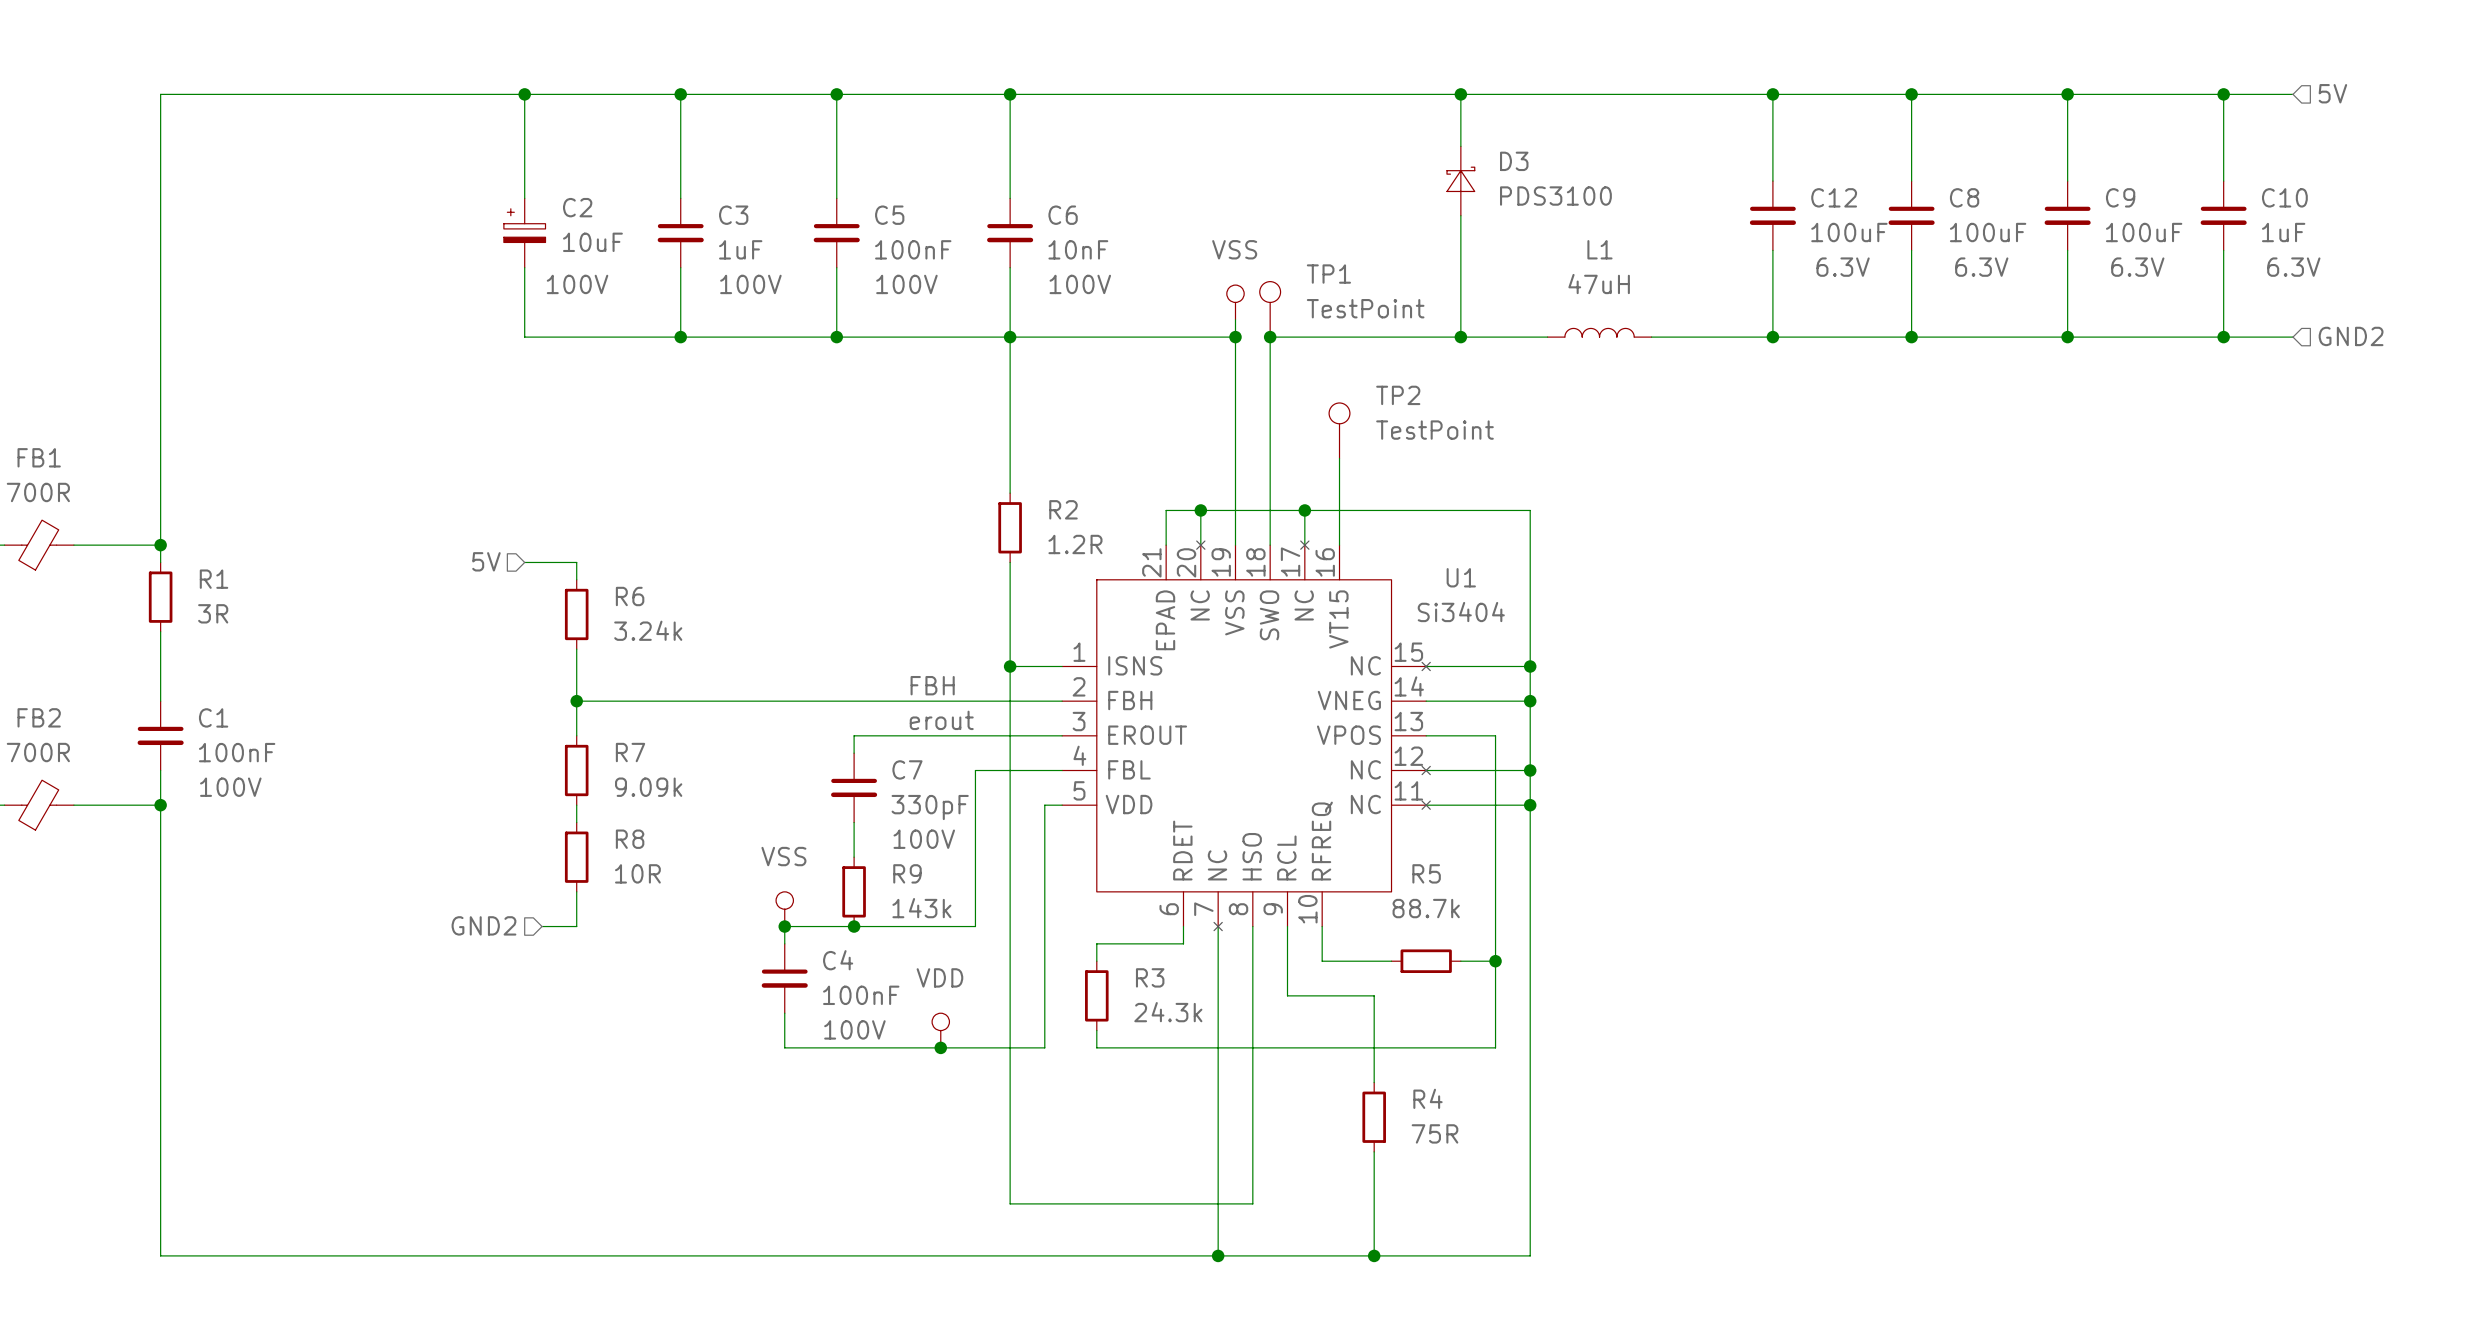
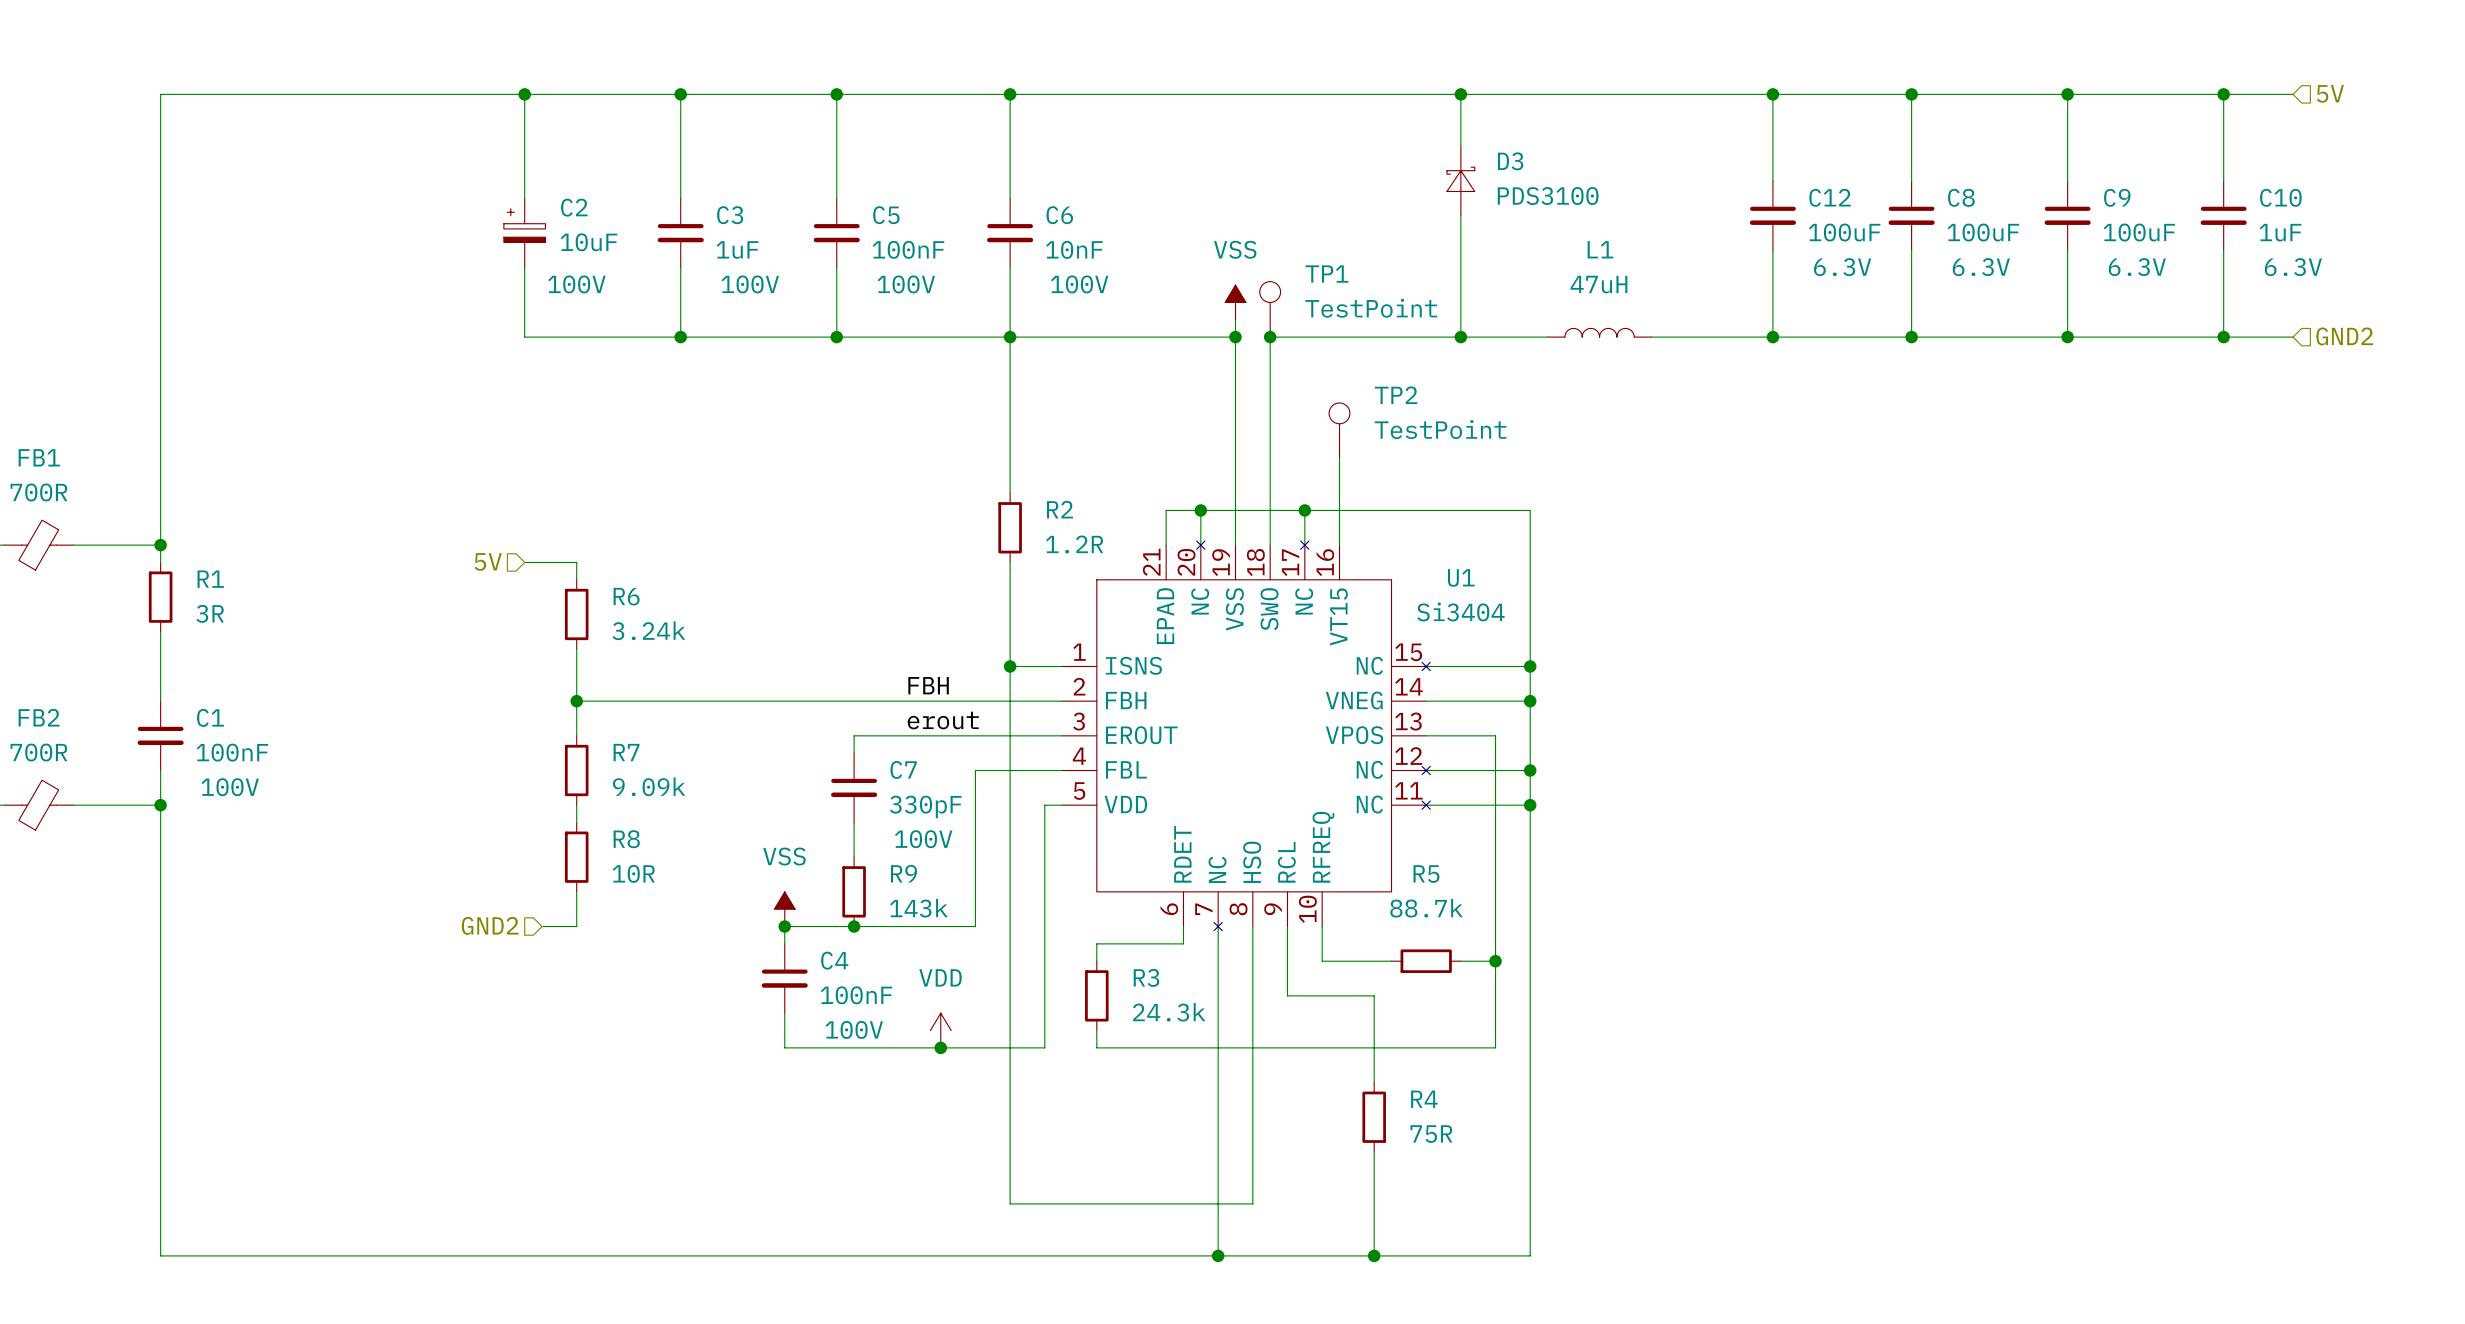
power symbol shape: [1226, 285, 1245, 320] -> [1225, 285, 1246, 320]
power symbol shape: [776, 891, 794, 927] -> [774, 891, 796, 927]
power symbol shape: [932, 1013, 950, 1048] -> [930, 1013, 952, 1048]

